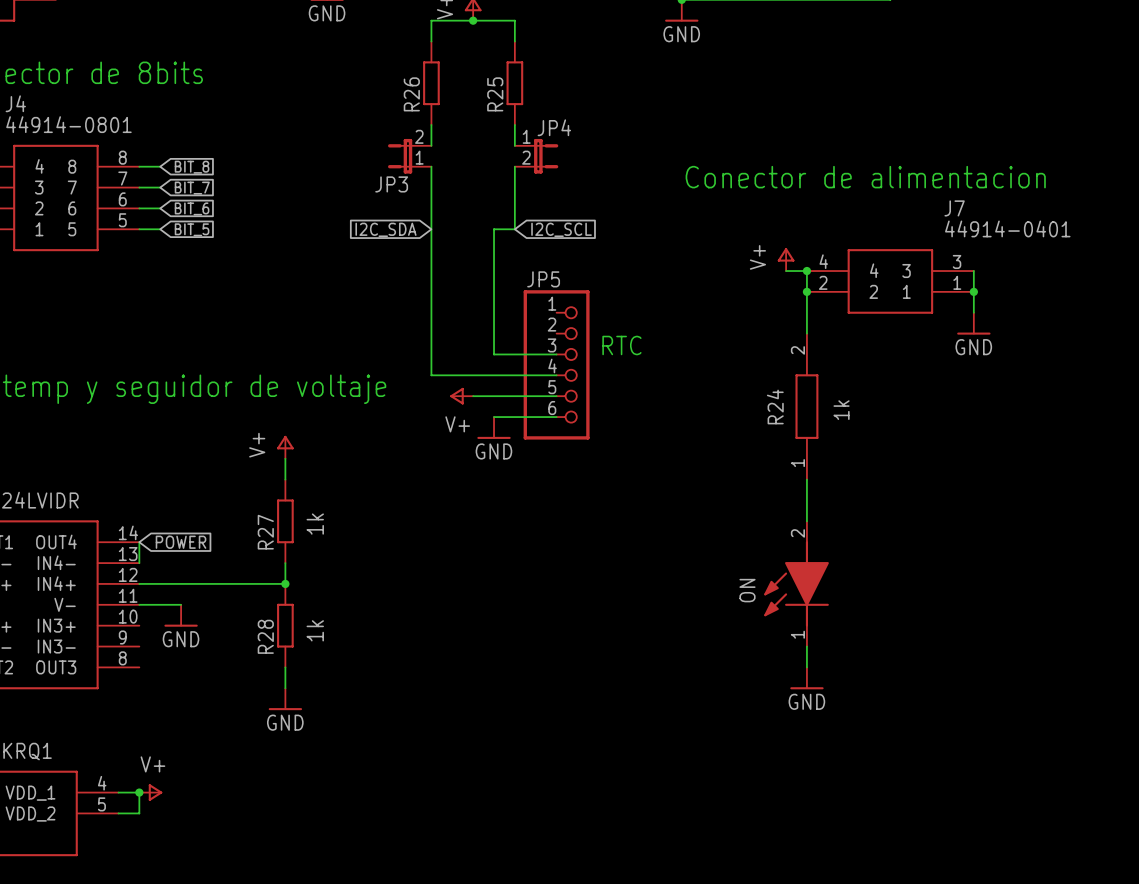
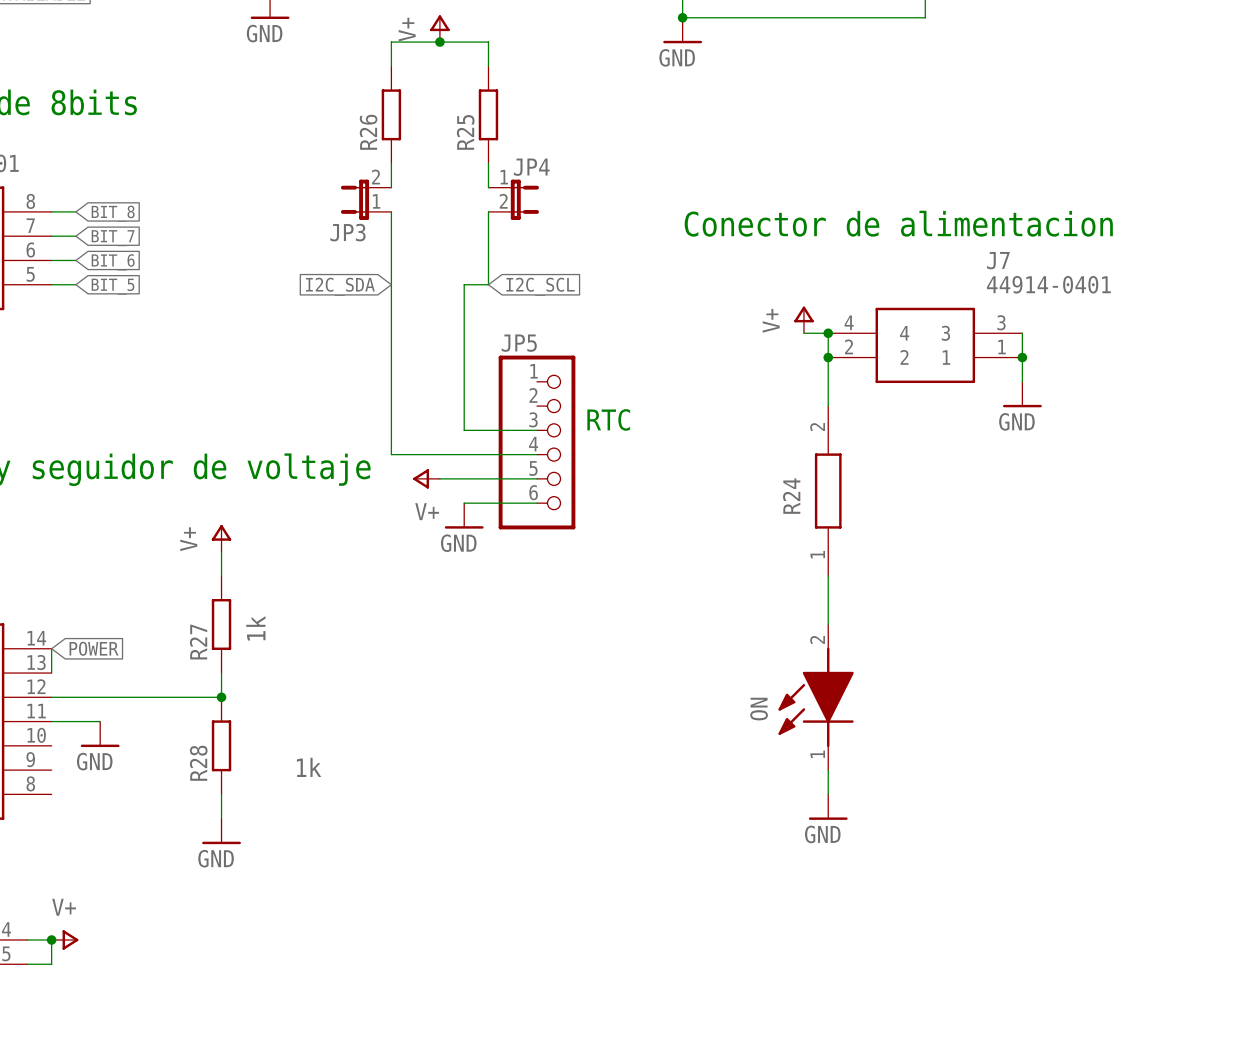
text: 1k (841, 410) -> none
text rotation: 0° (315, 630) -> 90° clockwise (309, 767)
text position: 1k (315, 630) -> 1k (309, 767)

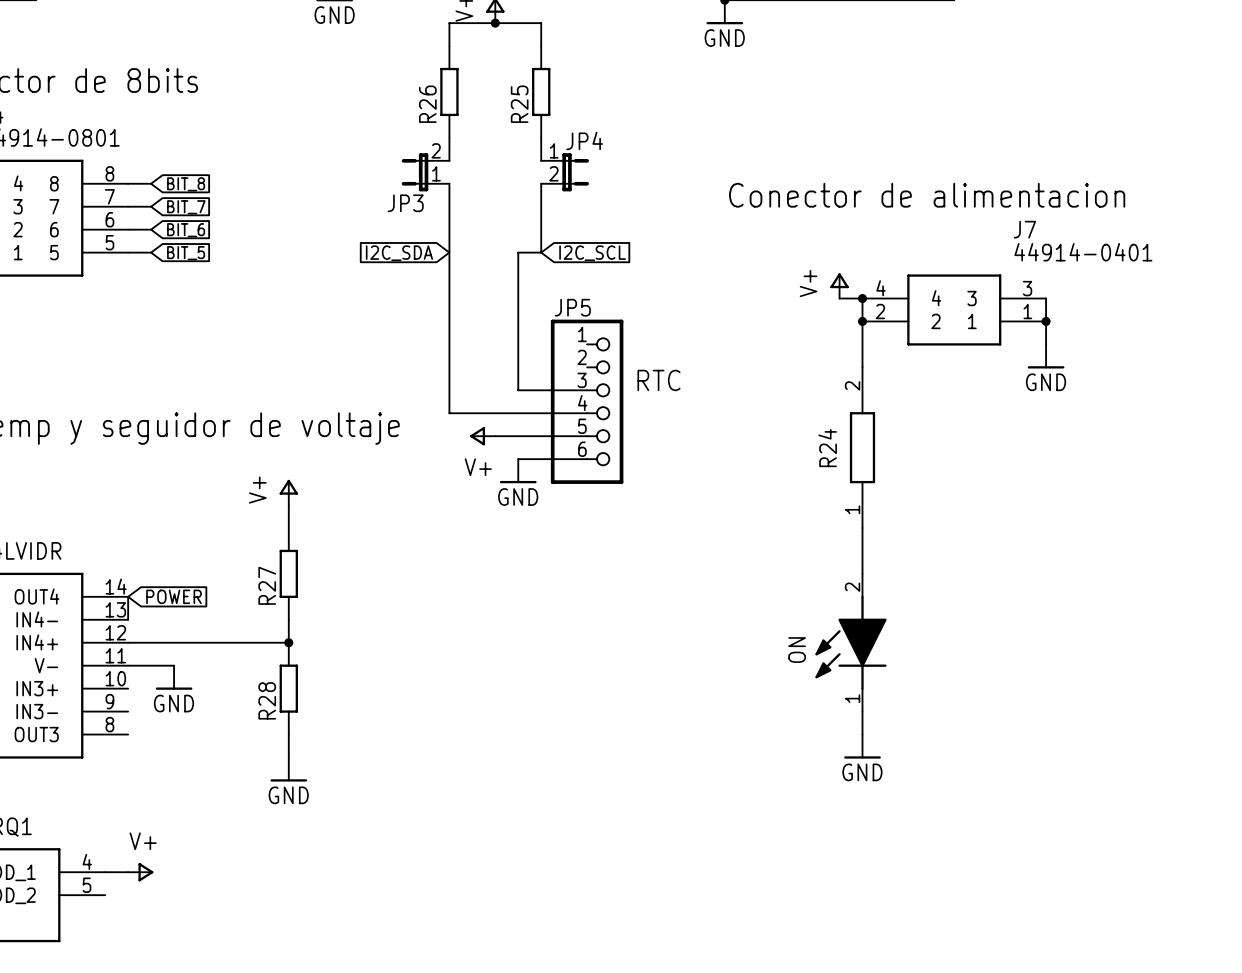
text: 1k (255, 628) -> none
text: 1k (309, 767) -> none
wire: (51, 939) (51, 964) (27, 964) -> none
junction: (51, 939) -> none

